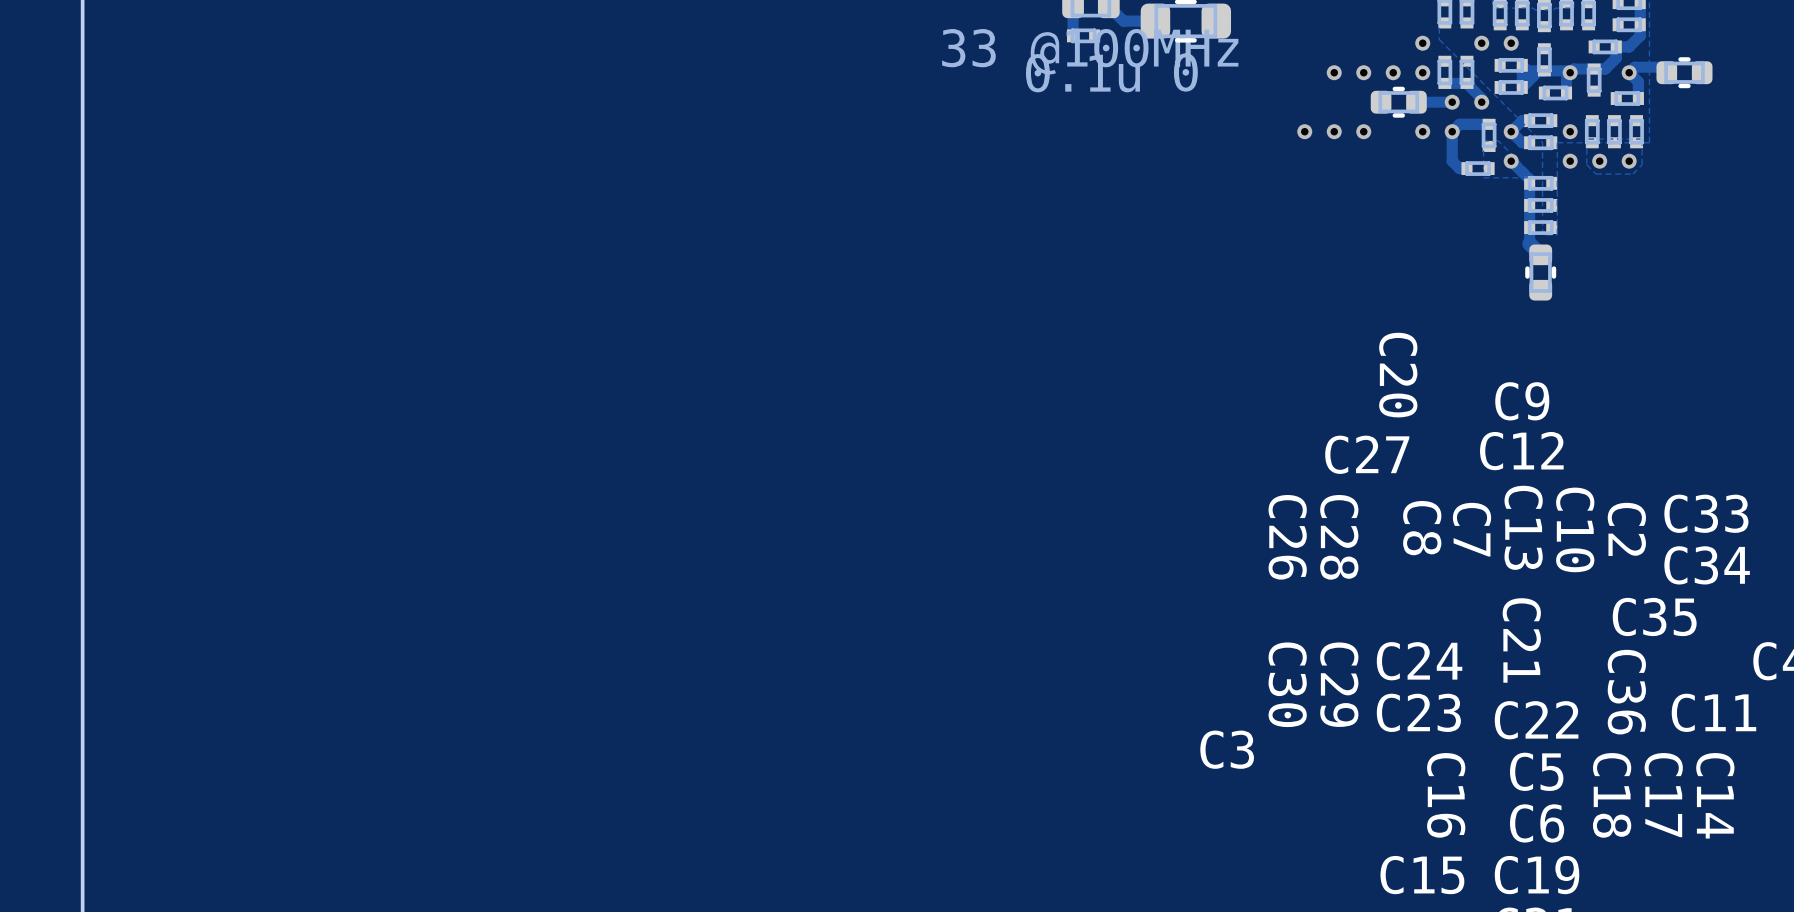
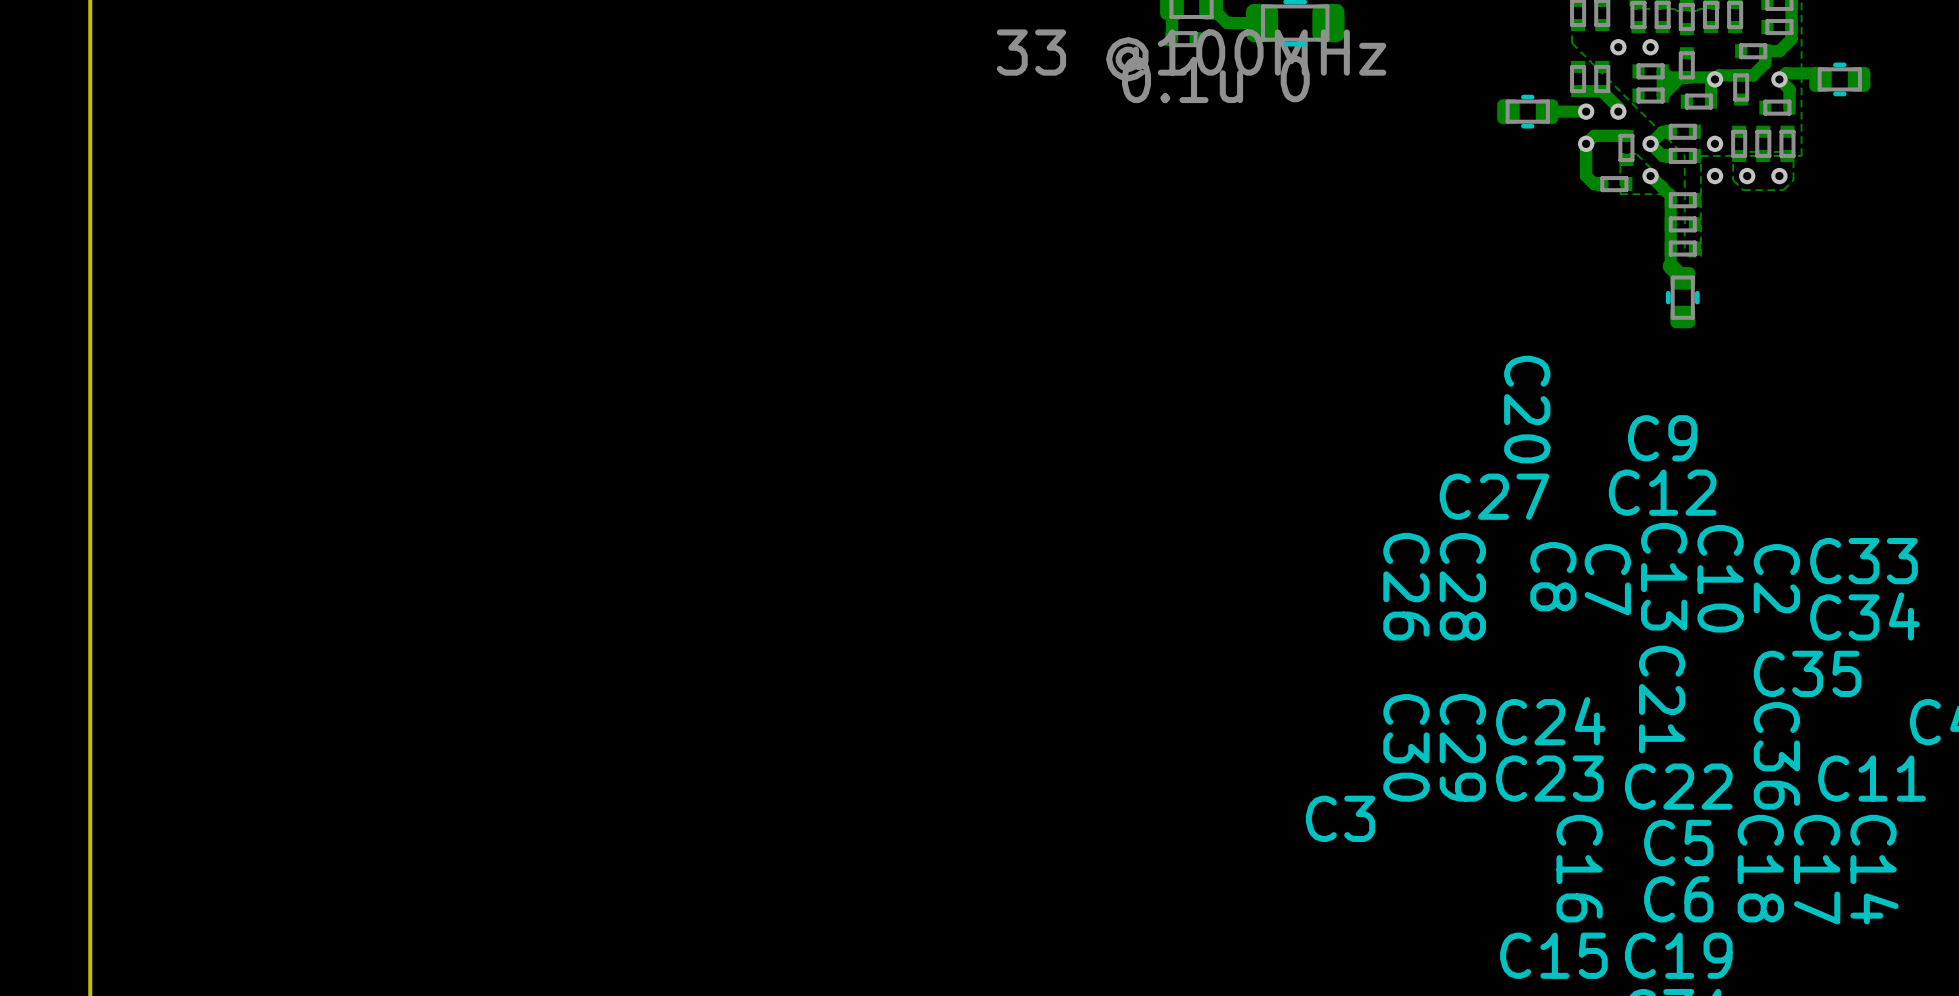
via: (1422, 43) -> none
via: (1334, 72) -> none
via: (1363, 72) -> none
via: (1393, 72) -> none
via: (1422, 72) -> none
via: (1304, 131) -> none
via: (1334, 131) -> none
via: (1363, 131) -> none
via: (1422, 131) -> none

